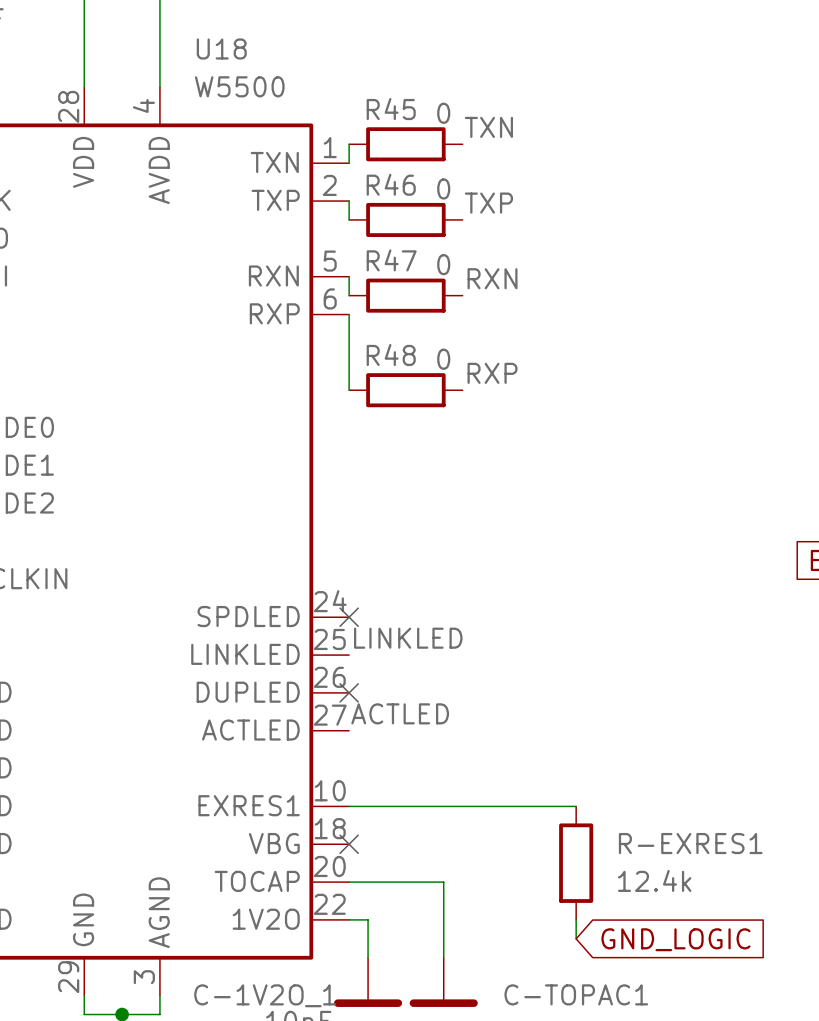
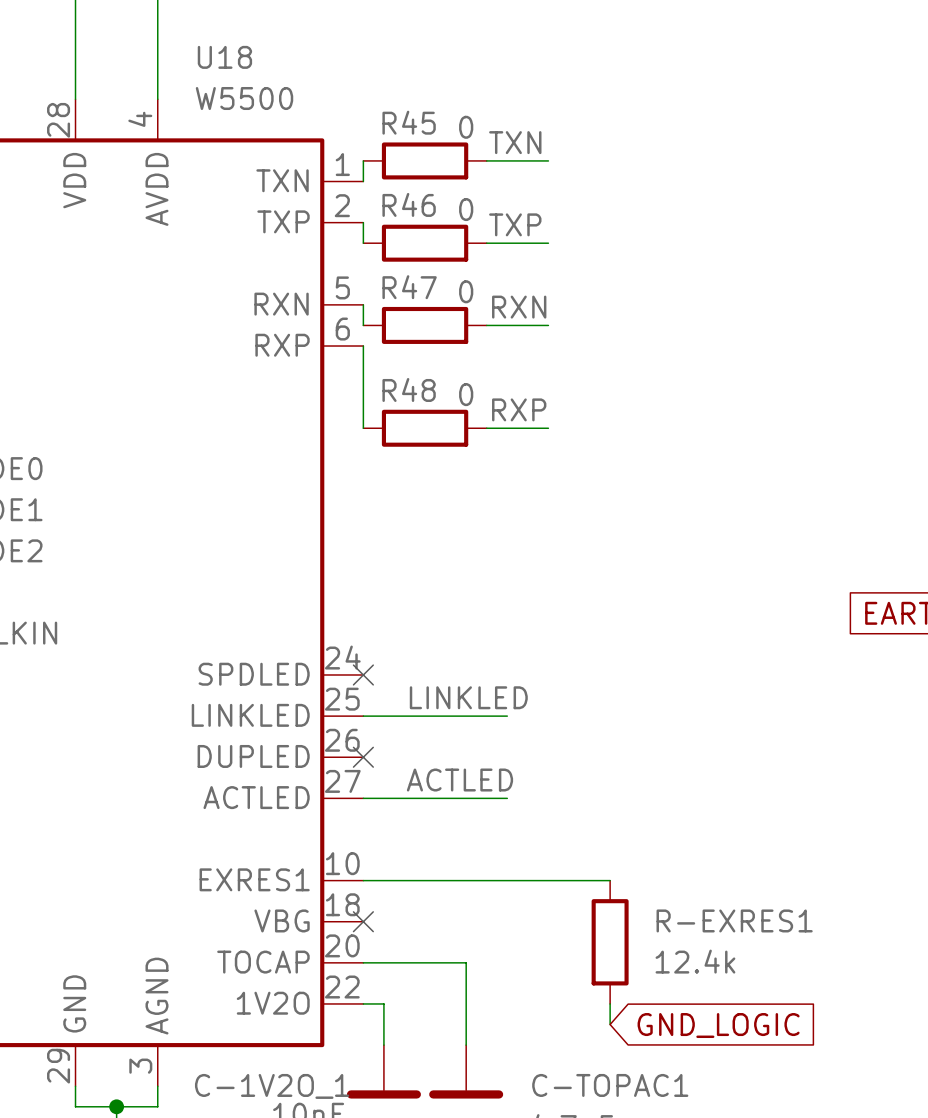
wire: none -> (486, 160) (548, 160)
wire: none -> (486, 243) (548, 243)
wire: none -> (486, 325) (548, 325)
wire: none -> (486, 428) (548, 428)
label position: LINKLED (408, 638) -> LINKLED (468, 697)
wire: none -> (363, 716) (507, 716)
label position: ACTLED (400, 713) -> ACTLED (459, 780)
wire: none -> (363, 798) (507, 798)

